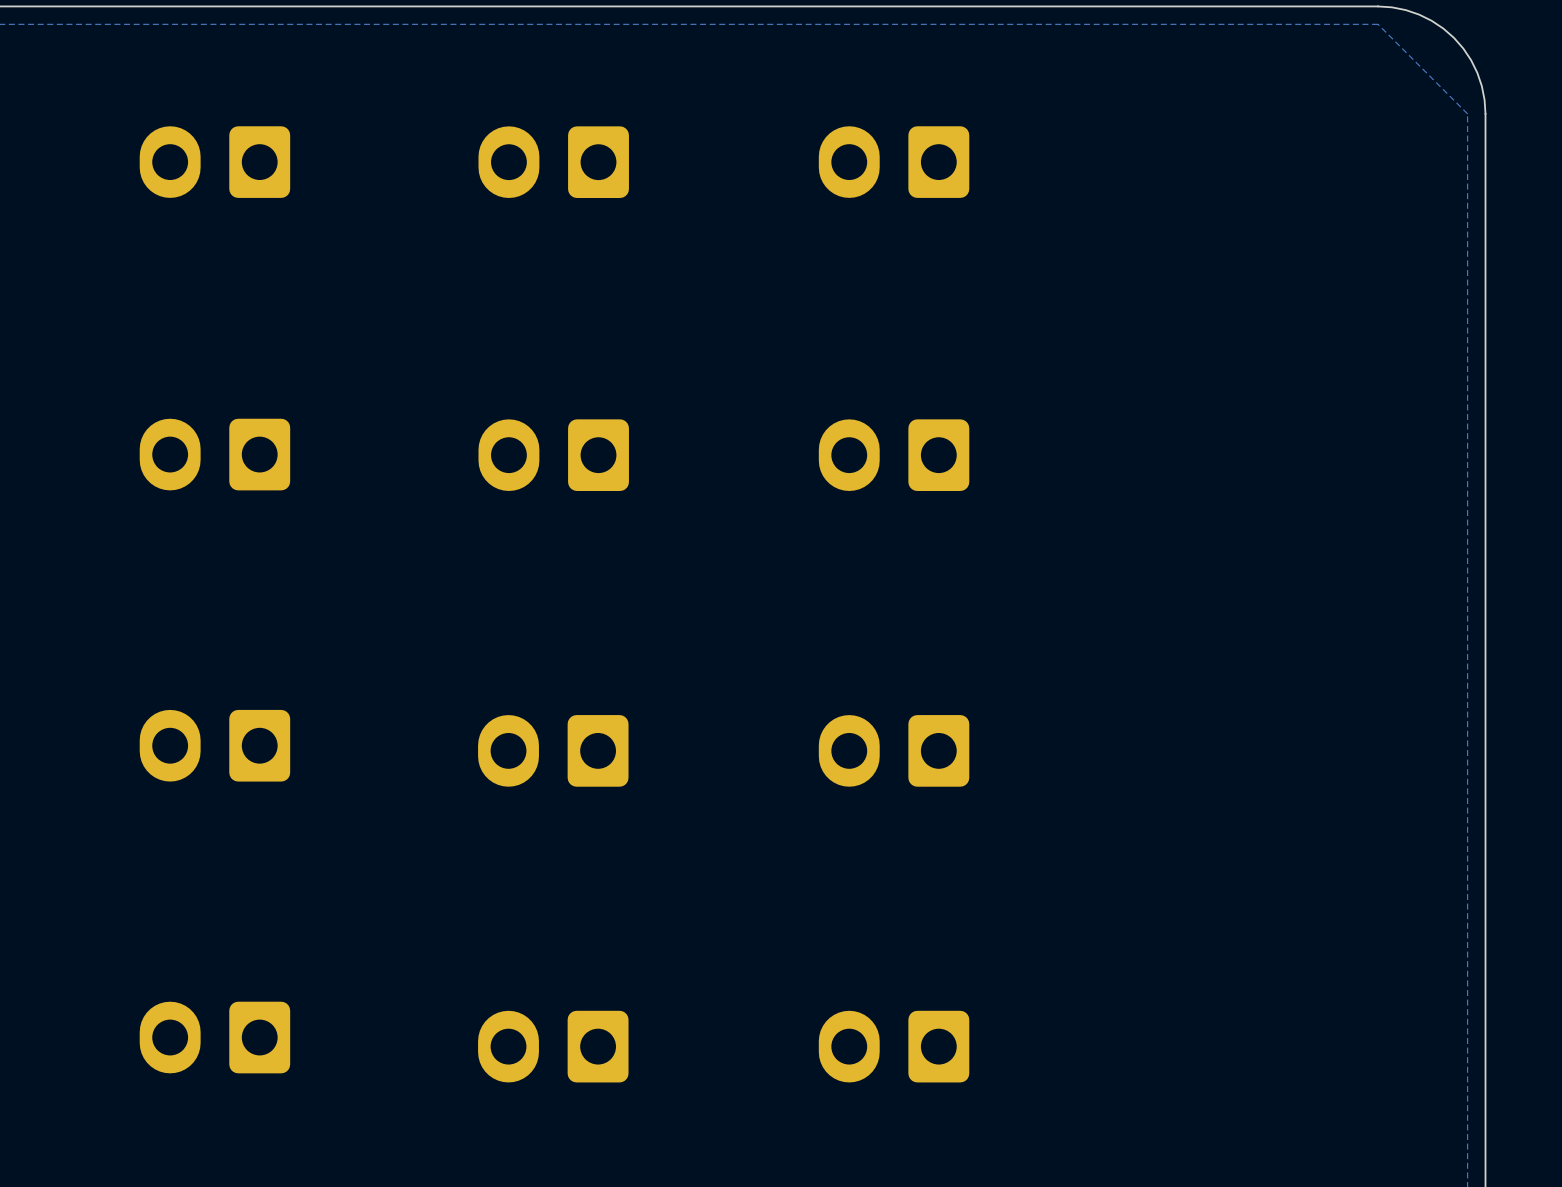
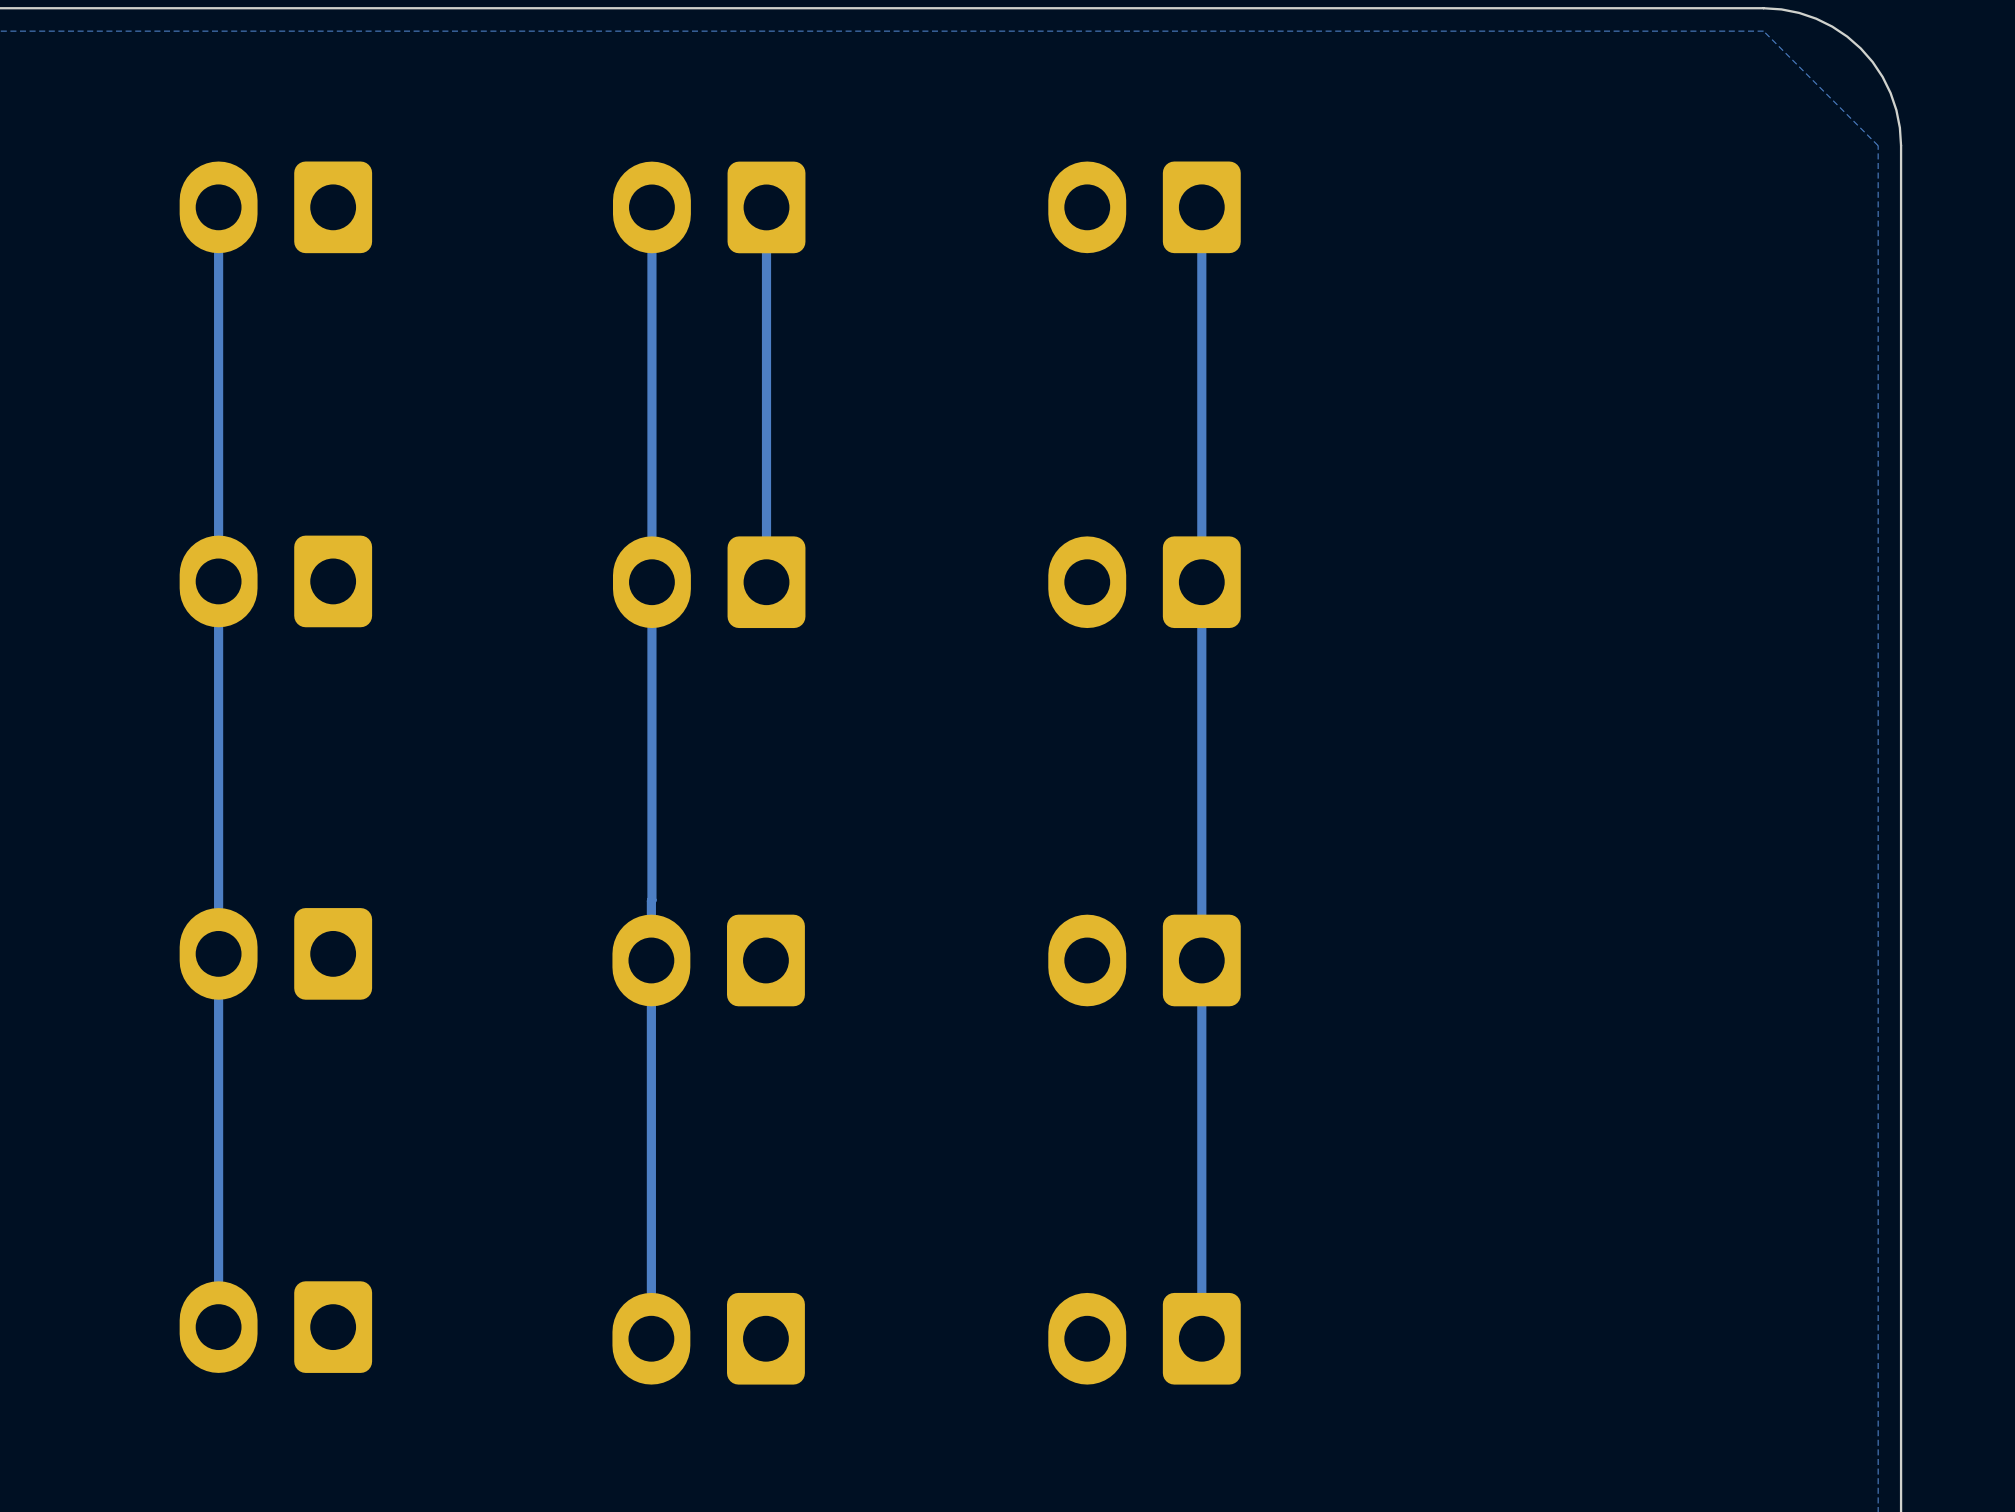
track: none -> (218, 207) (218, 1327)
track: none -> (651, 207) (651, 900)
track: none -> (766, 207) (766, 582)
track: none -> (1201, 207) (1201, 1338)
track: none -> (651, 900) (651, 1338)

